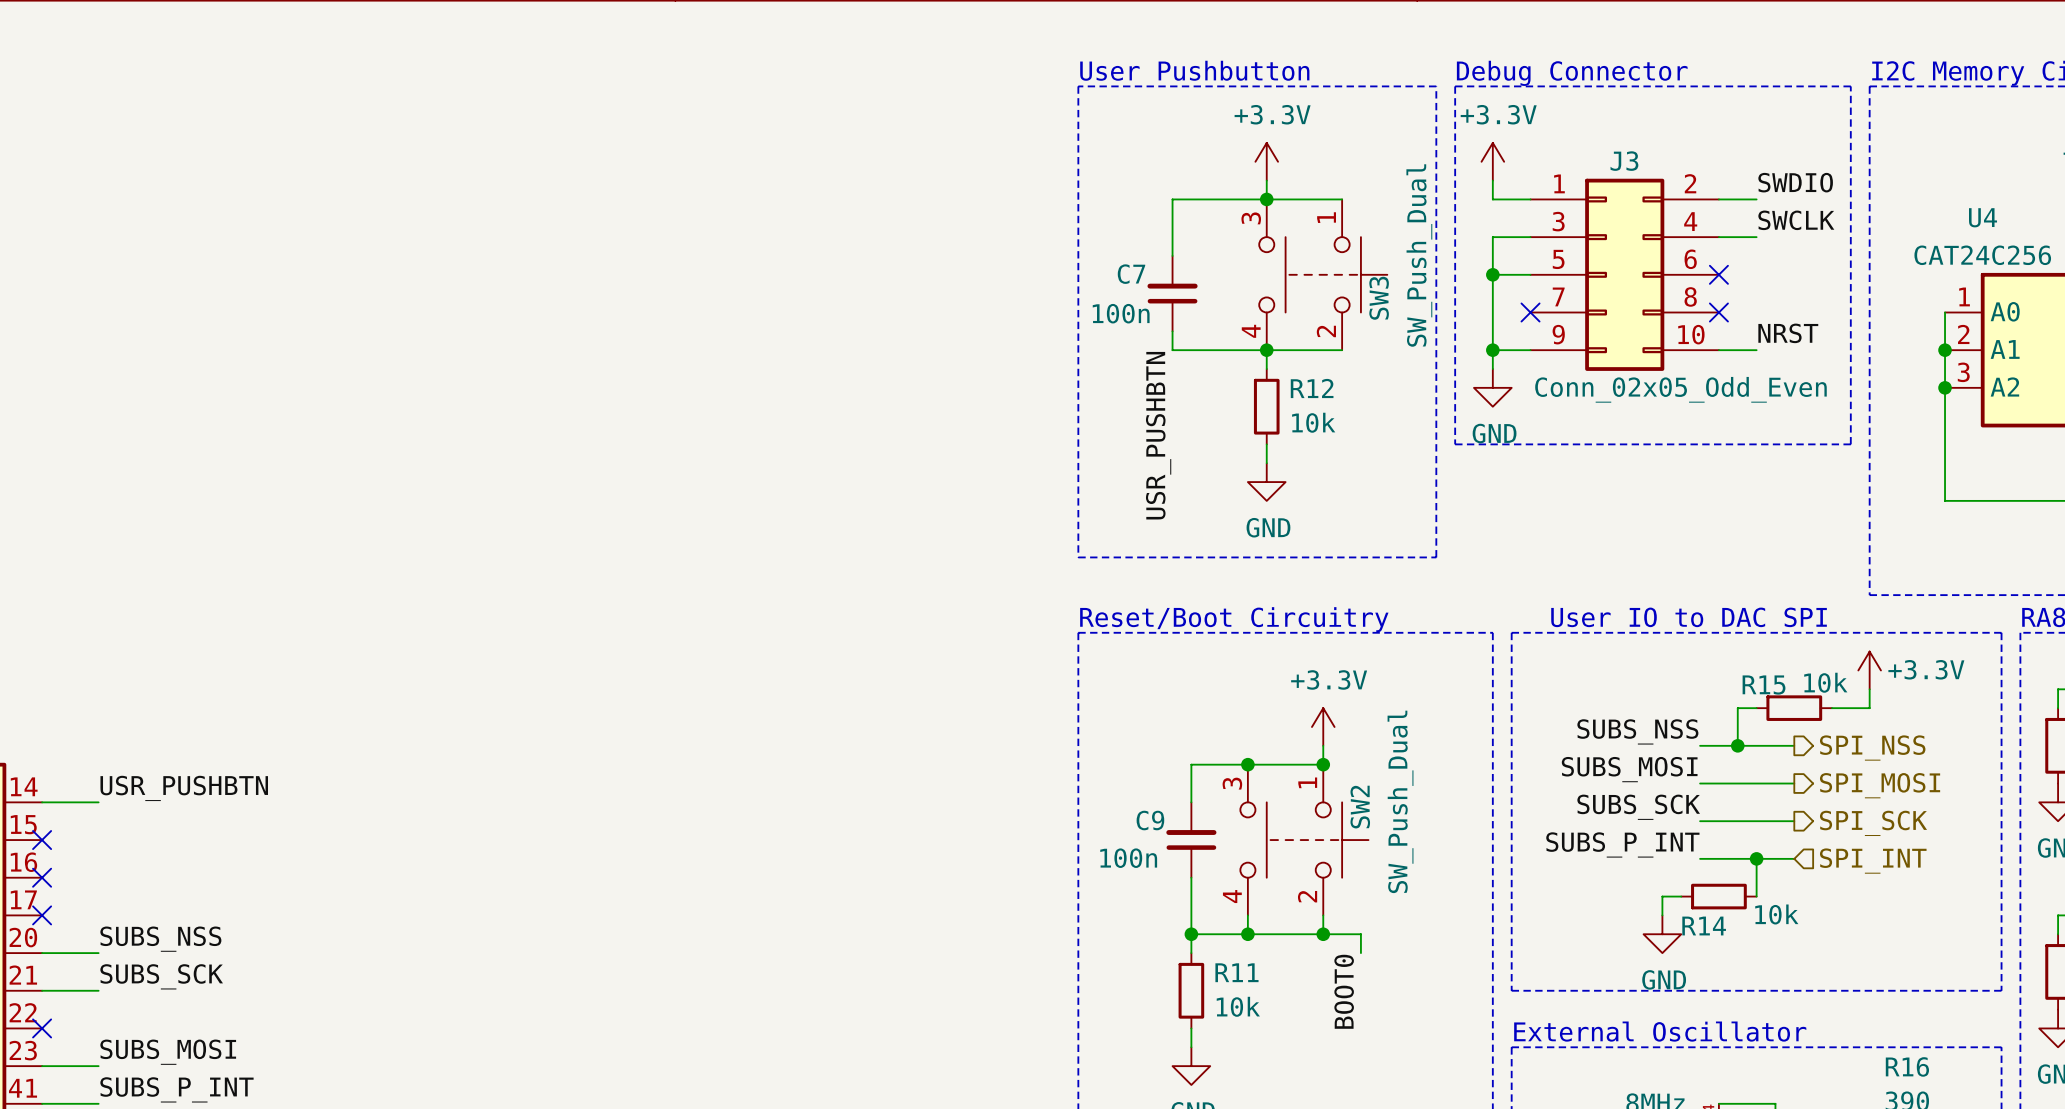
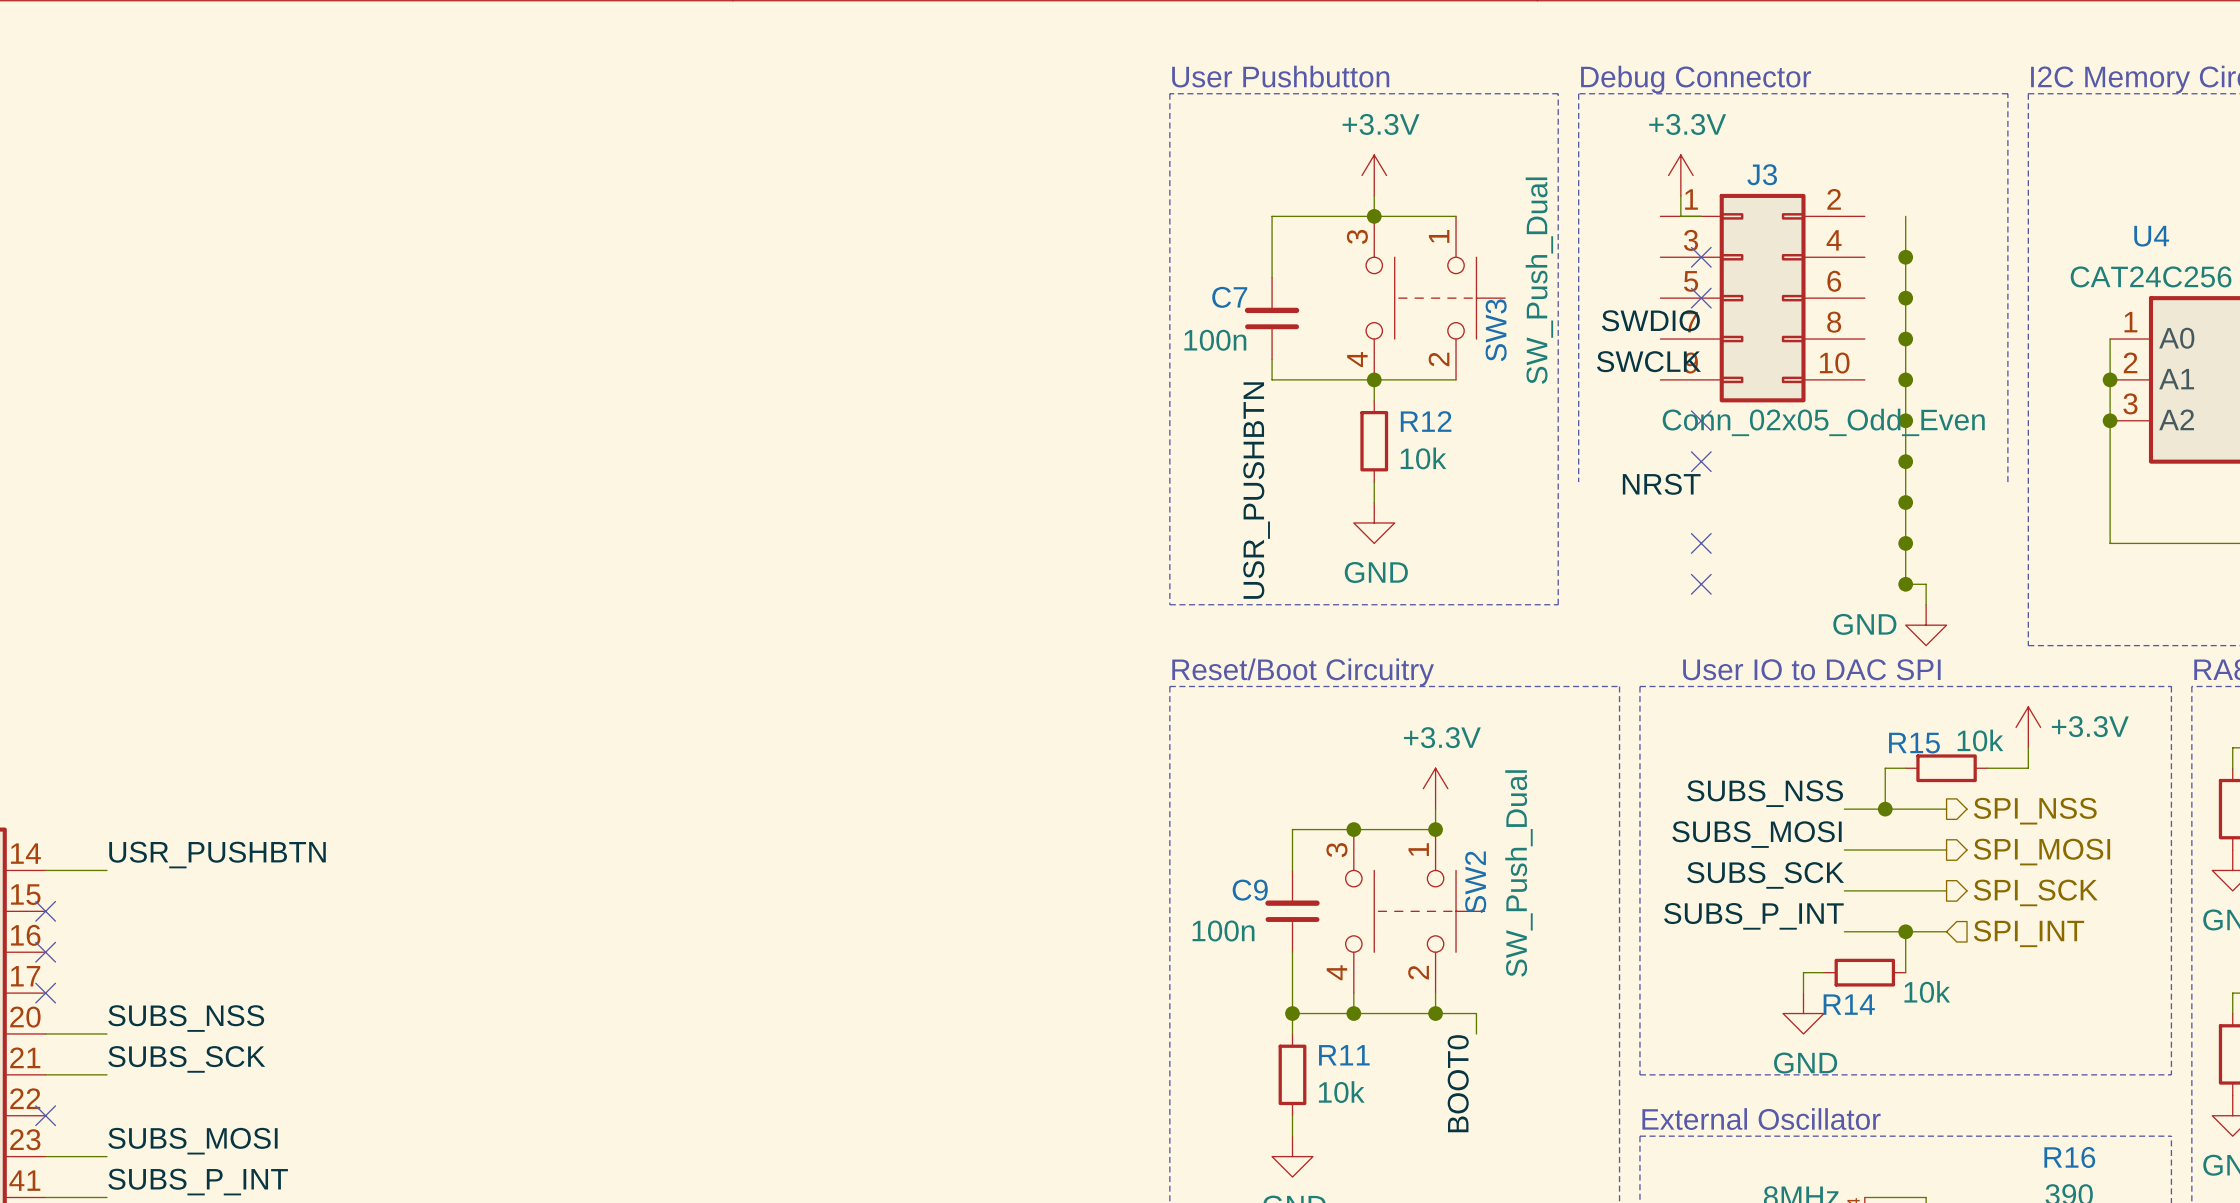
power symbol position: +3.3V (1492, 161) -> +3.3V (1680, 175)
wire: (1492, 180) (1492, 199) (1530, 199) -> none
wire: none -> (1680, 195) (1680, 216) (1701, 216)
label position: SWDIO (1795, 182) -> SWDIO (1650, 320)
wire: (1718, 199) (1756, 199) -> (1926, 604) (1926, 584) (1905, 584) (1905, 216)
label position: SWCLK (1796, 220) -> SWCLK (1648, 361)
wire: (1530, 237) (1492, 237) (1492, 369) -> none
no-connect mark: none -> (1701, 257)
wire: (1718, 237) (1756, 237) -> none
junction: none -> (1905, 257)
wire: (1492, 274) (1530, 274) -> none
junction: (1492, 274) -> none
no-connect mark: none -> (1701, 298)
no-connect mark: (1718, 274) -> none
junction: none -> (1905, 298)
no-connect mark: (1530, 312) -> none
no-connect mark: (1718, 312) -> none
junction: none -> (1905, 339)
label position: NRST (1788, 333) -> NRST (1661, 484)
wire: (1492, 350) (1530, 350) -> none
junction: (1492, 350) -> none
wire: (1718, 350) (1756, 350) -> none
junction: none -> (1905, 379)
power symbol position: GND (1492, 387) -> GND (1926, 625)
no-connect mark: none -> (1701, 420)
junction: none -> (1905, 420)
no-connect mark: none -> (1701, 461)
junction: none -> (1905, 461)
power symbol text position: GND (1494, 433) -> GND (1864, 624)
line: (1455, 444) (1850, 444) -> none
junction: none -> (1905, 502)
no-connect mark: none -> (1701, 543)
junction: none -> (1905, 543)
no-connect mark: none -> (1701, 584)
junction: none -> (1905, 584)

